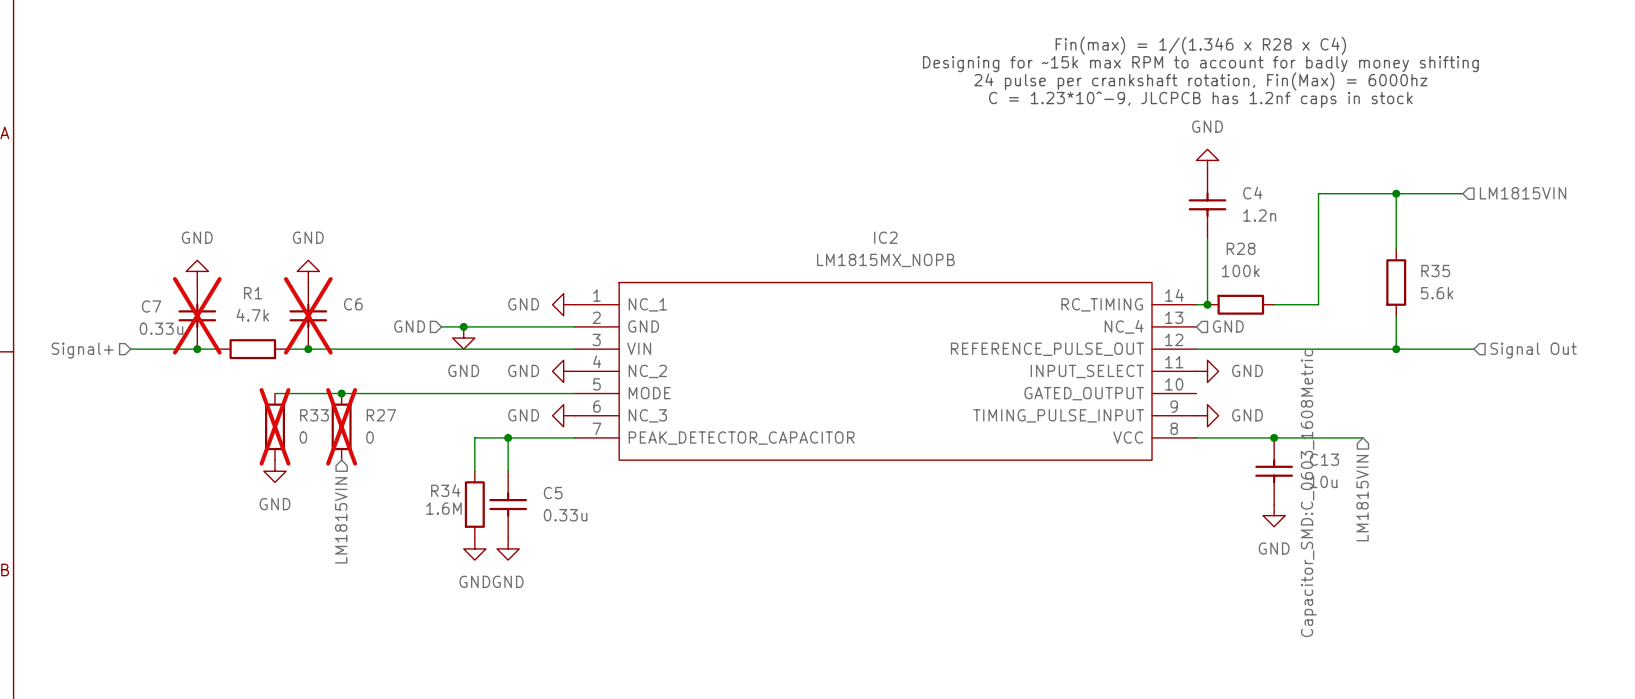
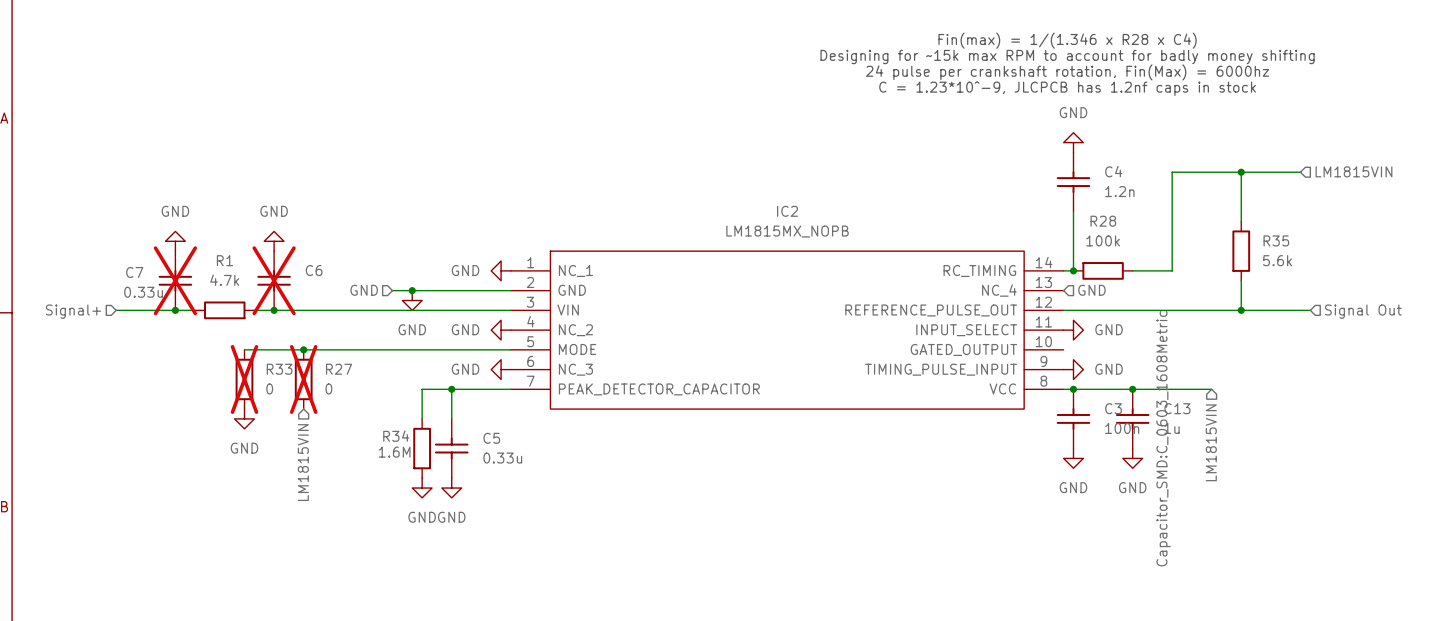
junction: none -> (1073, 389)
C3: none -> 100n (1073, 418)
C13 value: 10u (1323, 481) -> 1u (1172, 428)
power symbol: none -> GND (1073, 458)

